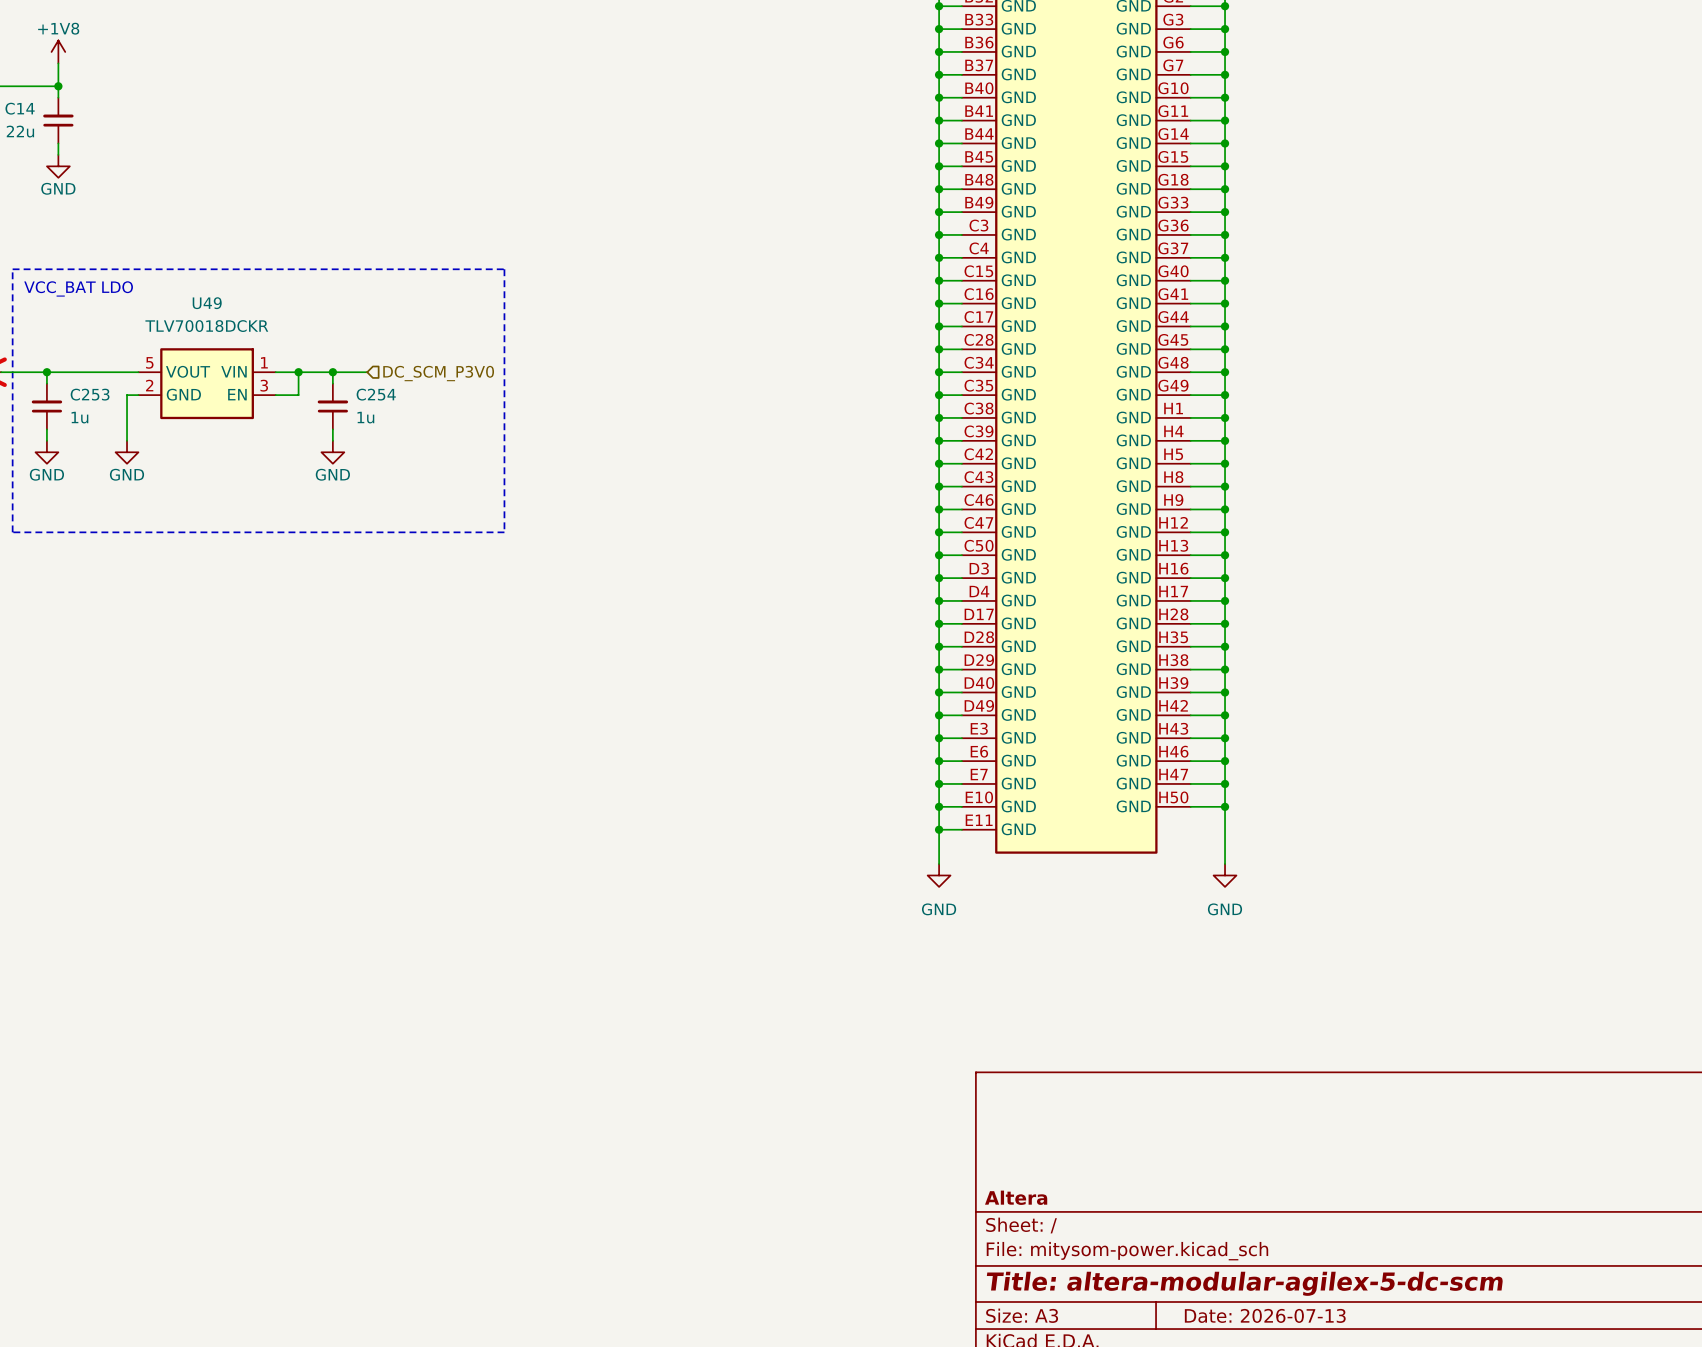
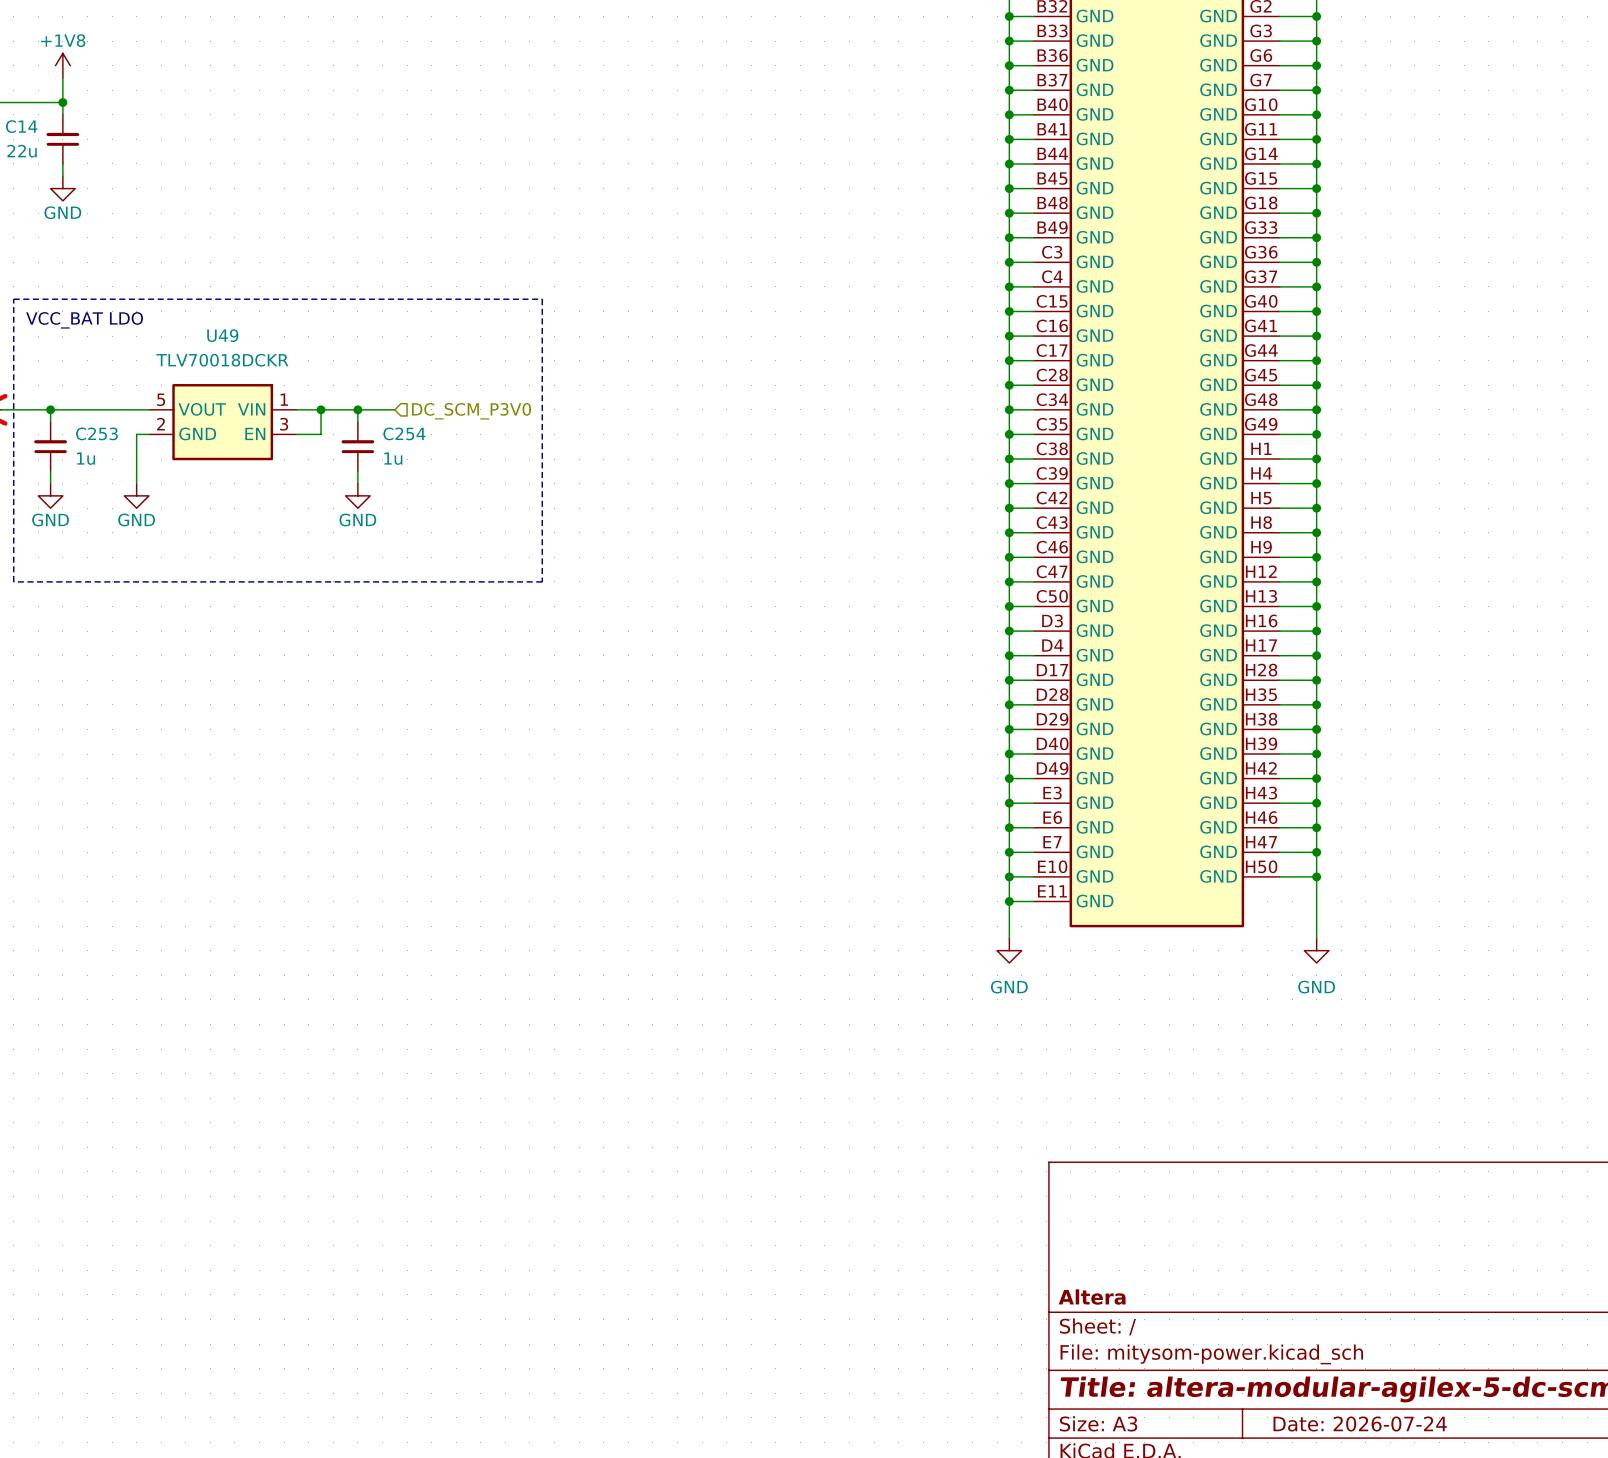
title block: Date: 2026-07-13 (1265, 1315) -> Date: 2026-07-24 (1360, 1424)

